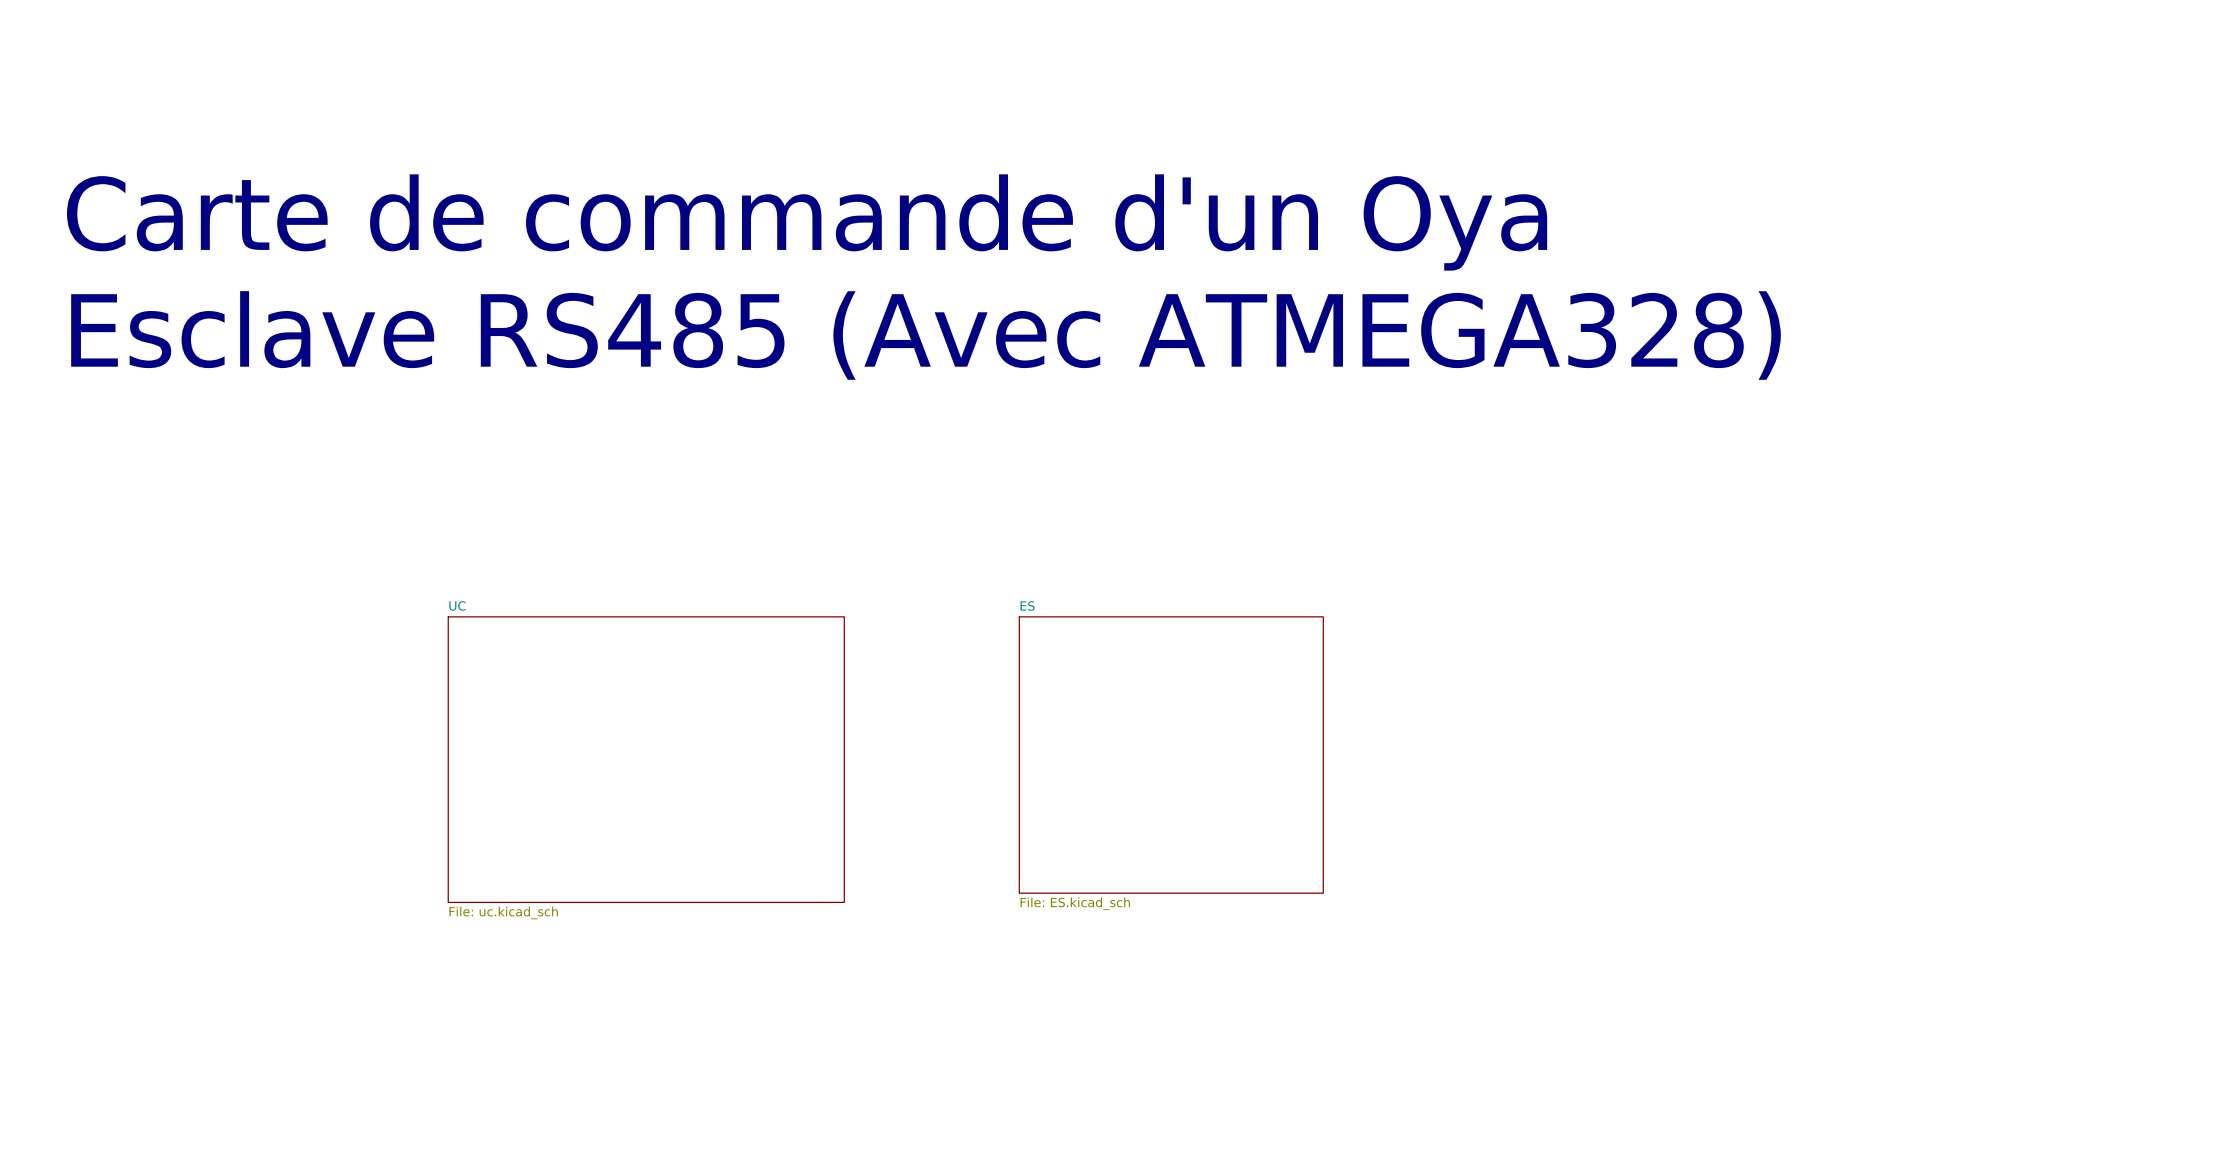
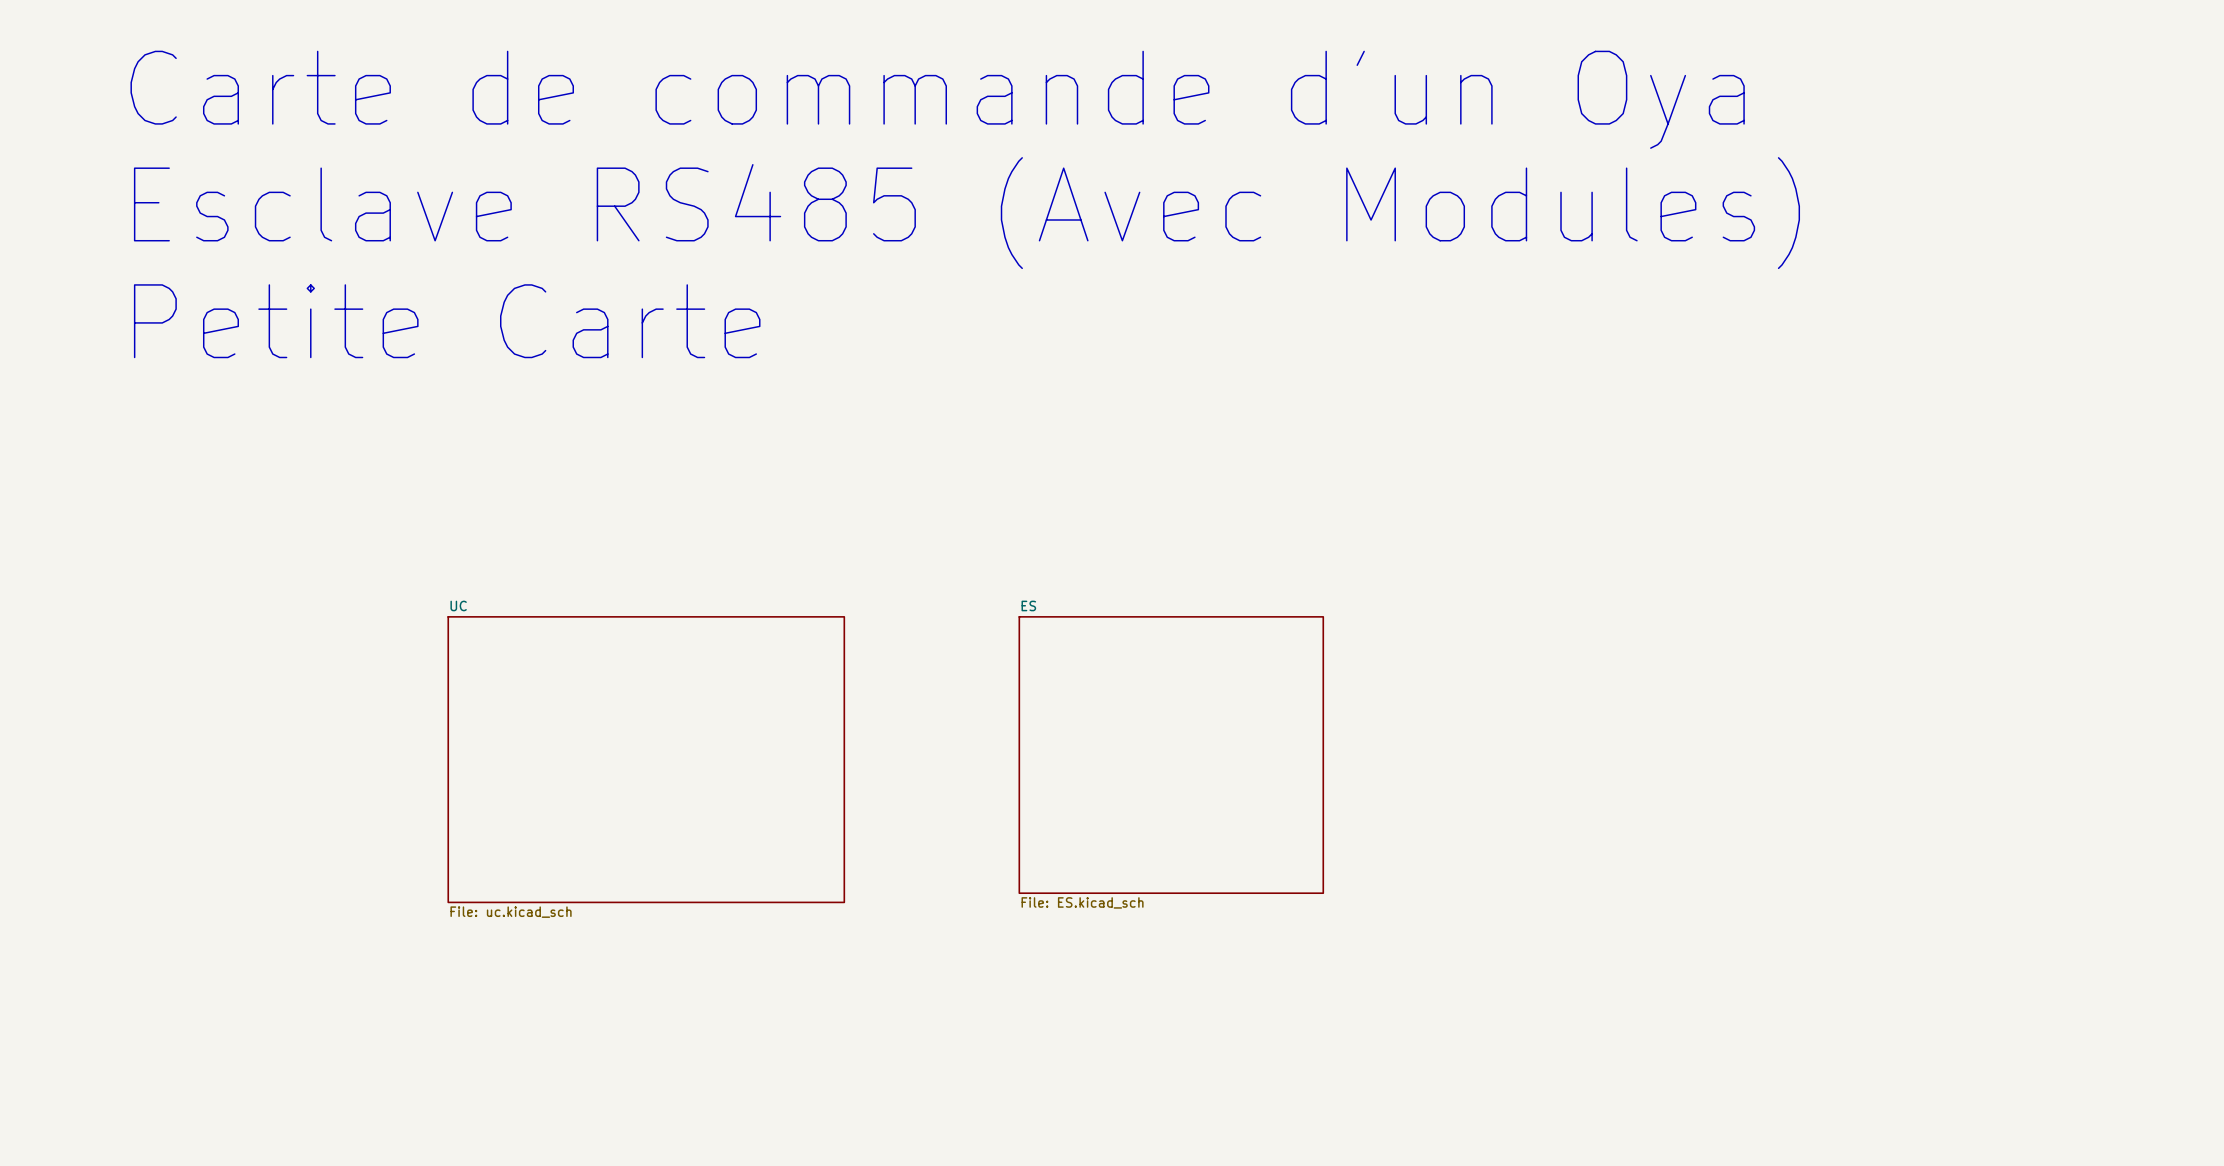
text position: Carte de commande d'un Oya (807, 222) -> Carte de commande d'un Oya (937, 99)
text: none -> Petite Carte (447, 321)
text: Esclave RS485 (Avec ATMEGA328) (926, 335) -> Esclave RS485 (Avec Modules) (966, 213)

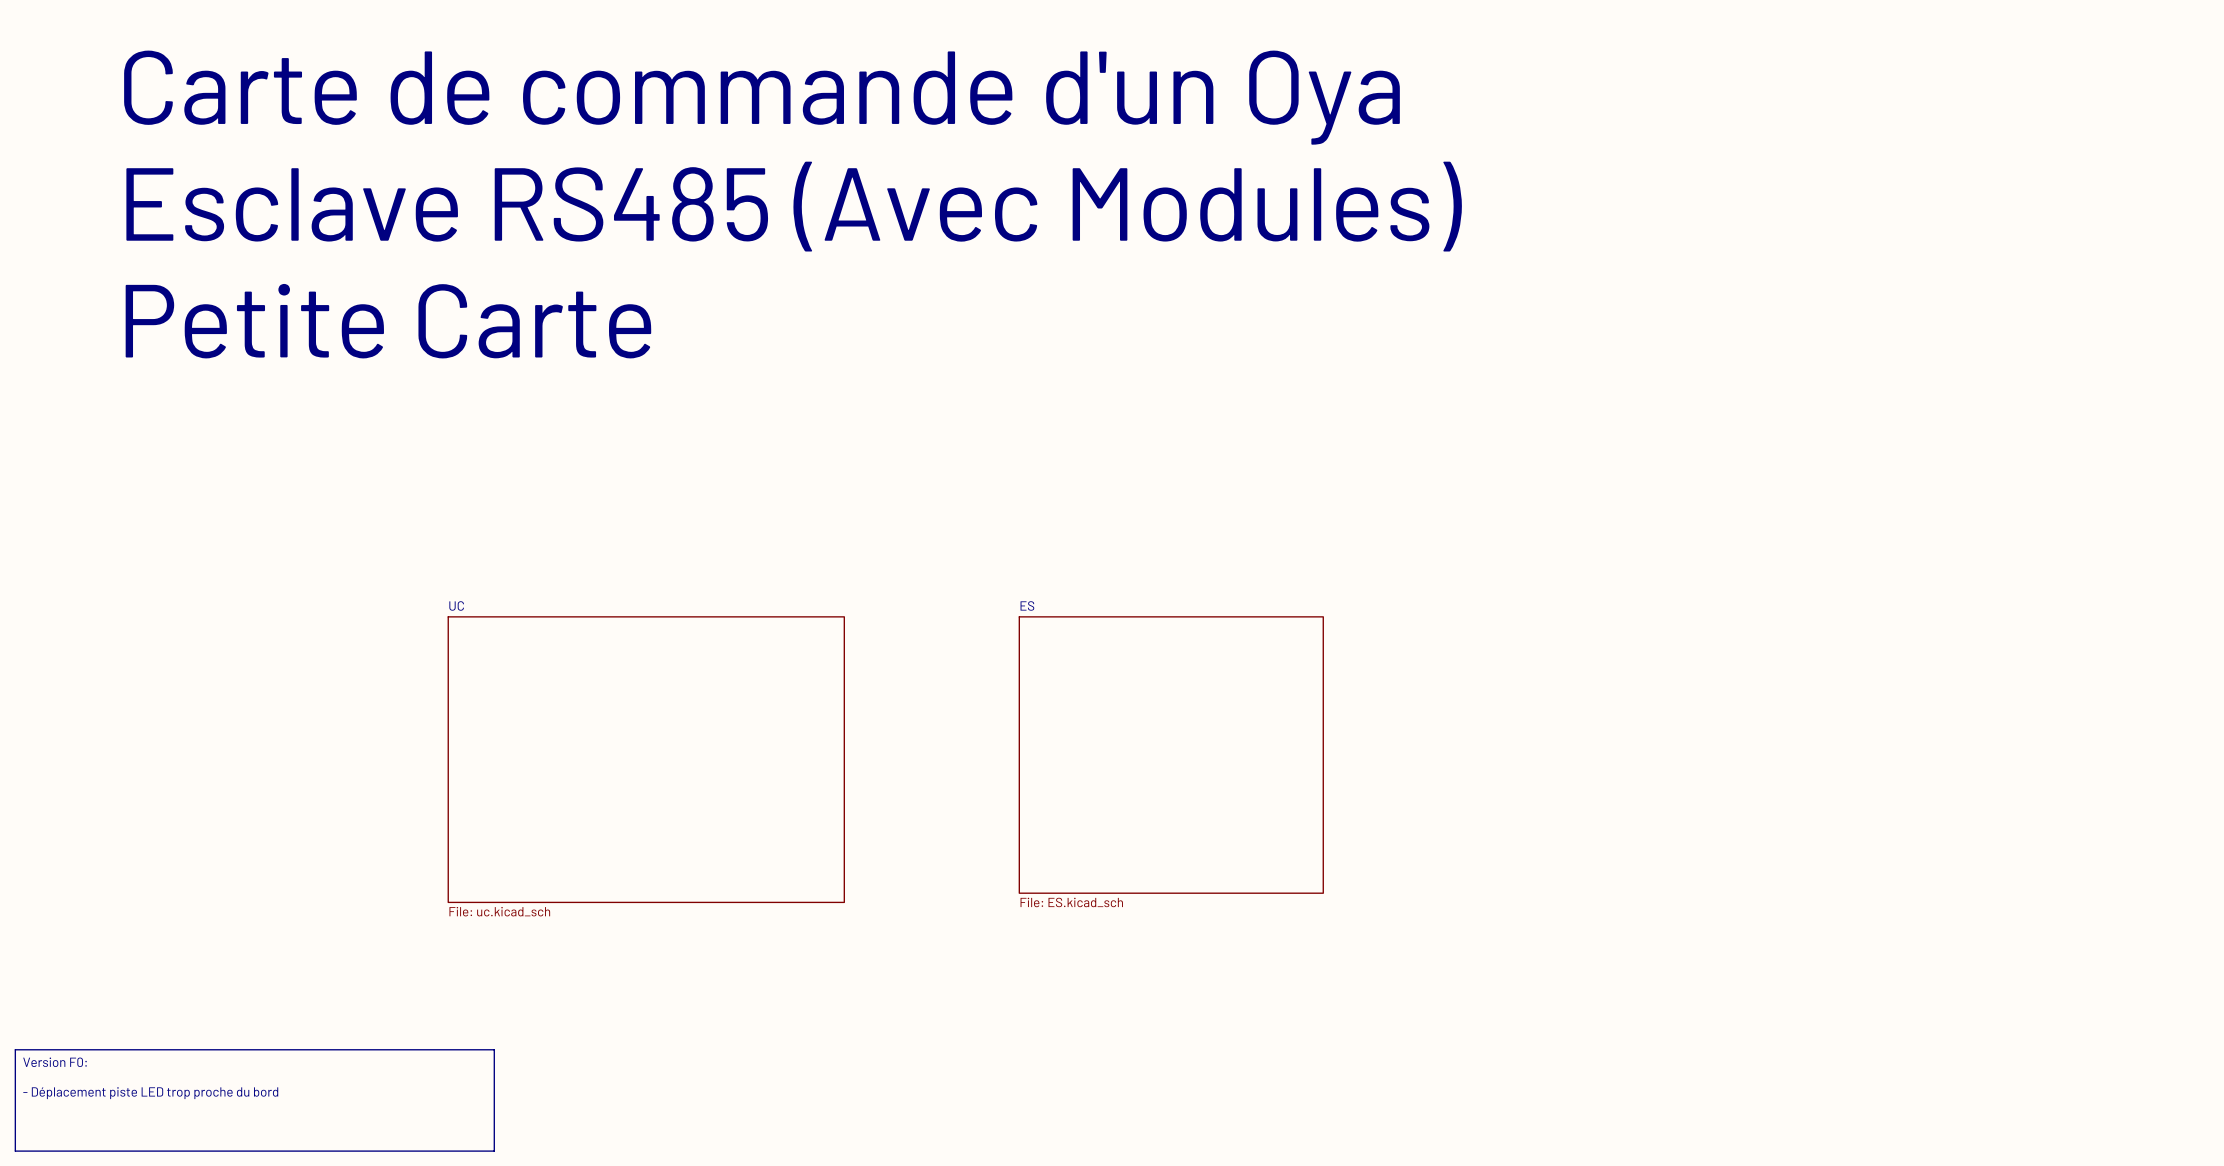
line: none -> (15, 1049) (494, 1049) (494, 1151) (15, 1151) (15, 1049)
text: none -> Version F0: (55, 1062)
text: none -> - Déplacement piste LED trop proche du bord (150, 1093)

